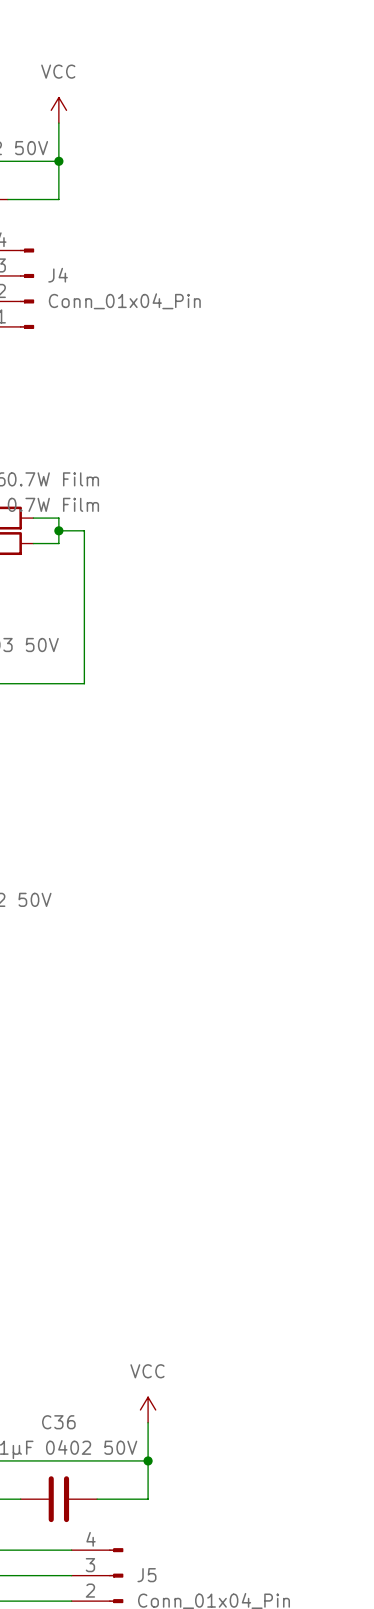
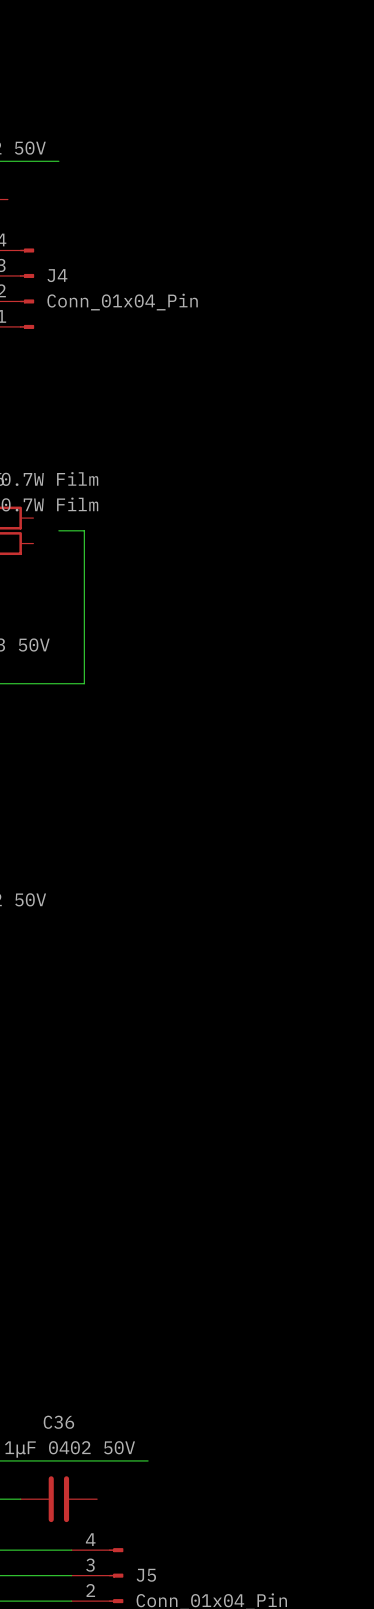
power symbol: VCC (58, 110) -> none
wire: (58, 123) (58, 199) (7, 199) -> none
junction: (58, 161) -> none
wire: (33, 518) (58, 518) (58, 543) (33, 543) -> none
junction: (58, 530) -> none
power symbol: VCC (148, 1409) -> none
wire: (148, 1422) (148, 1499) (97, 1499) -> none
junction: (148, 1460) -> none

